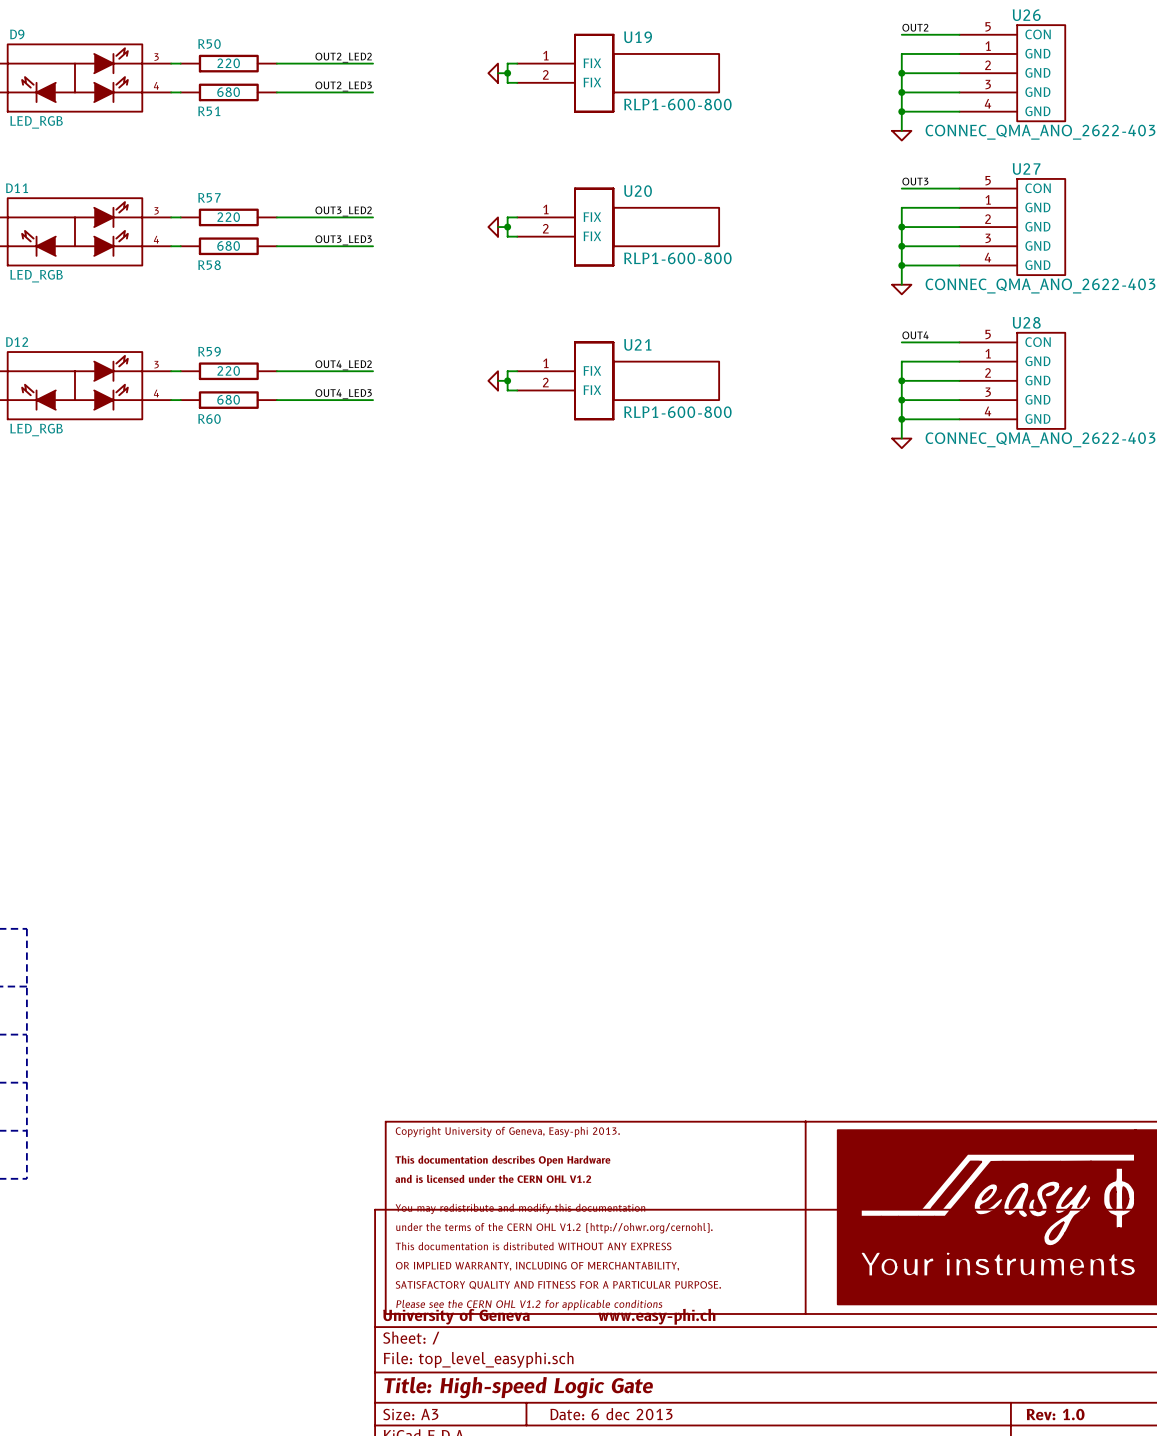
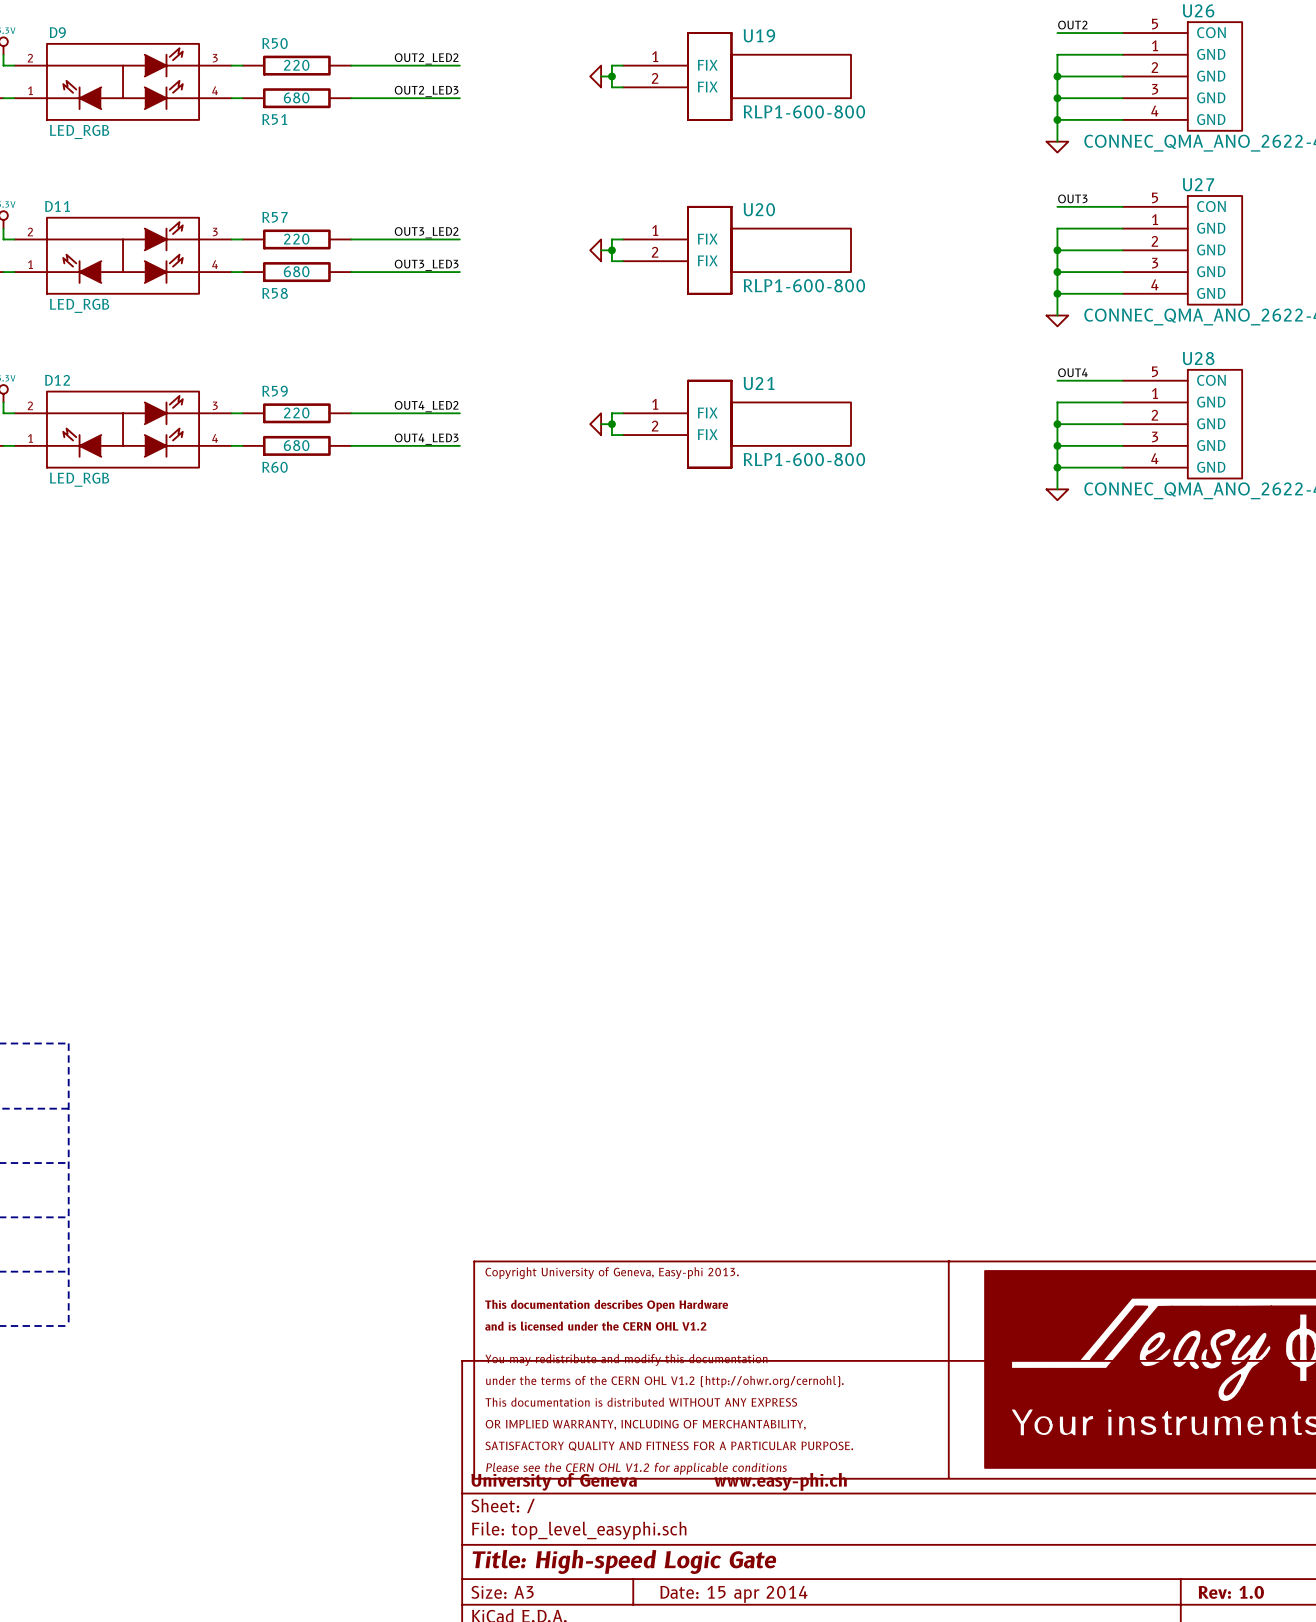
title block: Date: 6 dec 2013 (611, 1414) -> Date: 15 apr 2014 (733, 1594)

